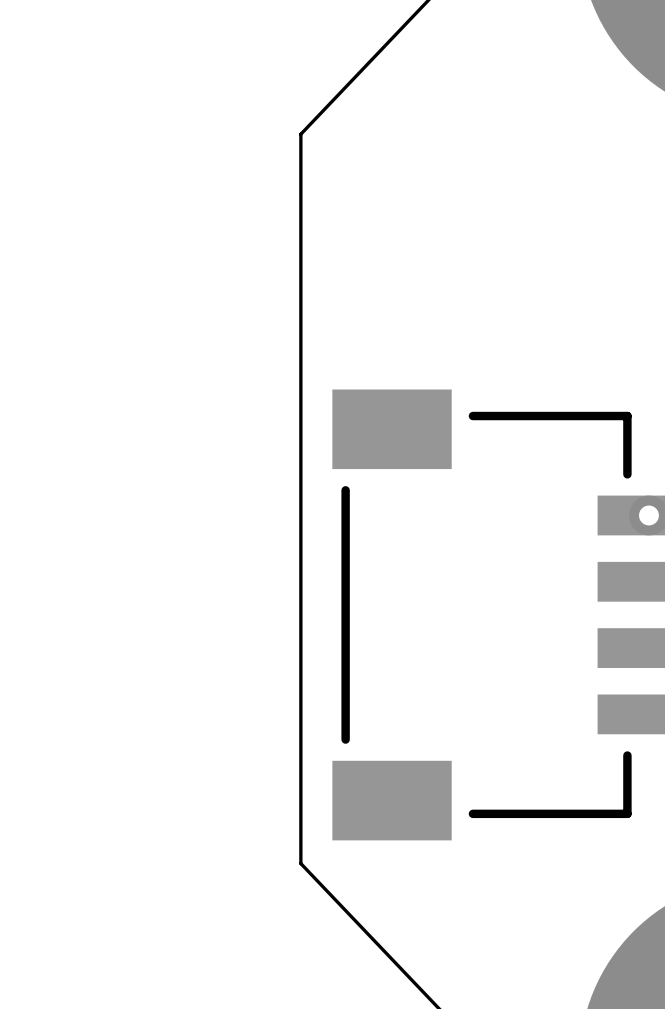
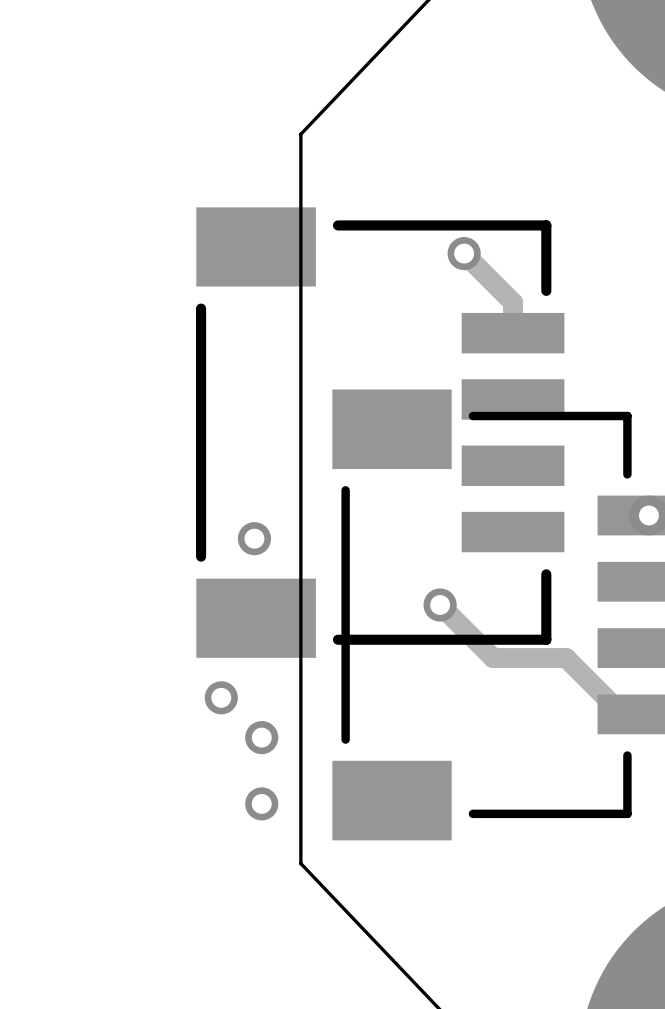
track: none -> (464, 253) (513, 302) (513, 333)
via: none -> (464, 253)
part: none -> (380, 432)
via: none -> (254, 538)
track: none -> (440, 604) (493, 658) (566, 658) (619, 711)
via: none -> (440, 604)
via: none -> (221, 697)
via: none -> (261, 737)
via: none -> (261, 803)

